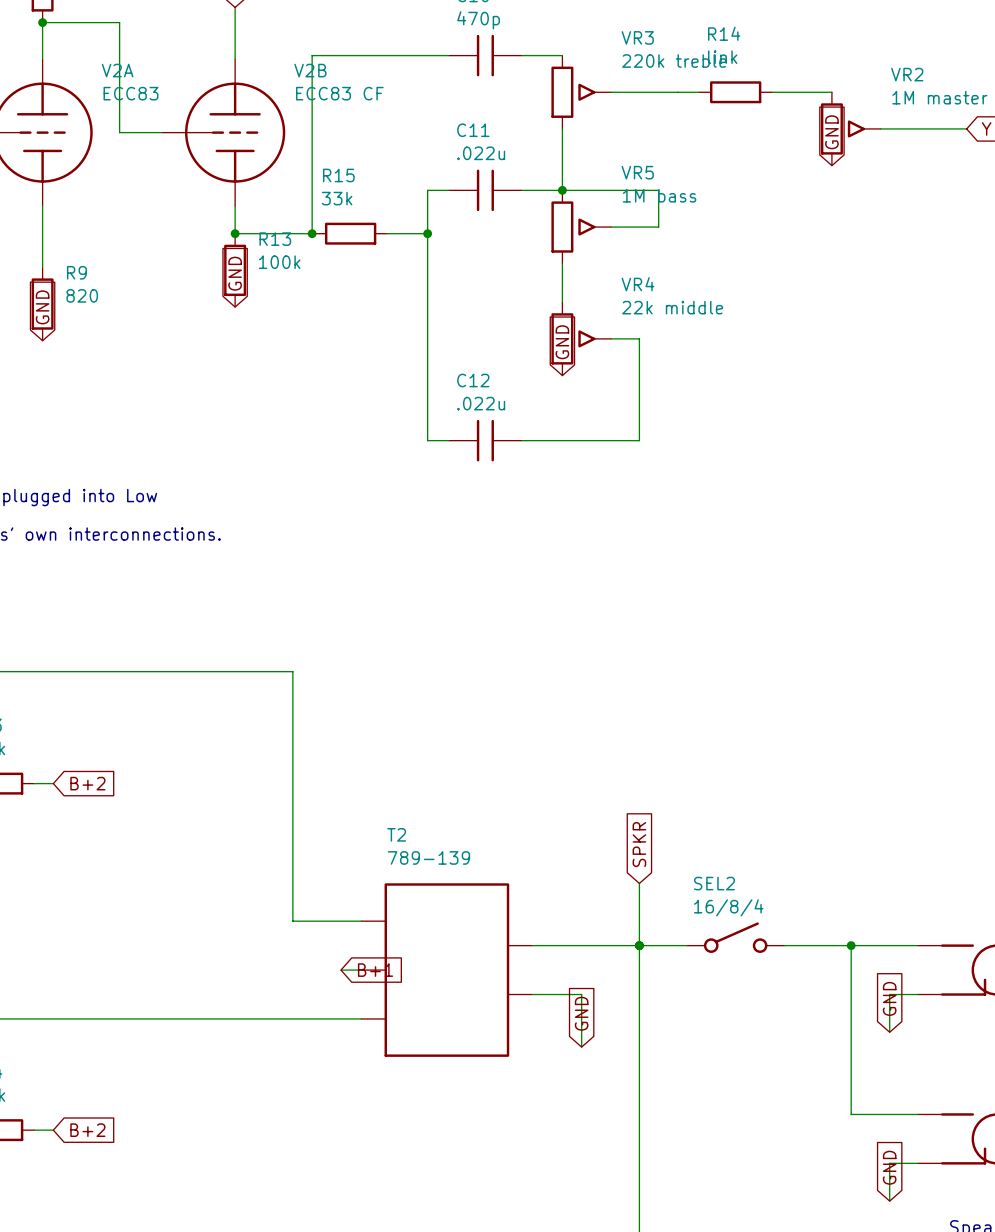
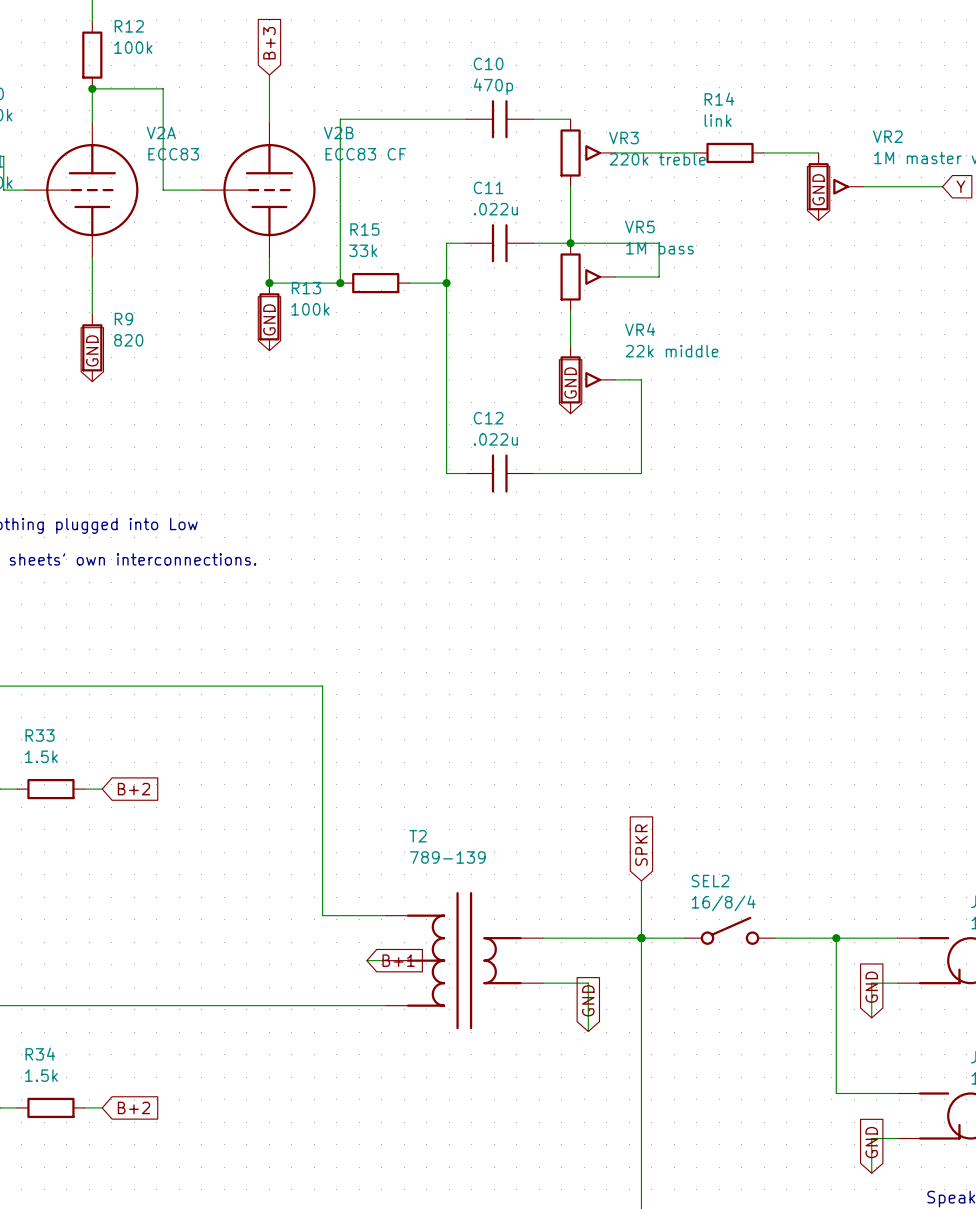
VR3 name position: VR3 (637, 37) -> VR3 (623, 138)
VR3 value position: 220k treble (674, 61) -> 220k treble (657, 159)
T2 symbol: [361, 883, 533, 1057] -> [385, 892, 544, 1030]

